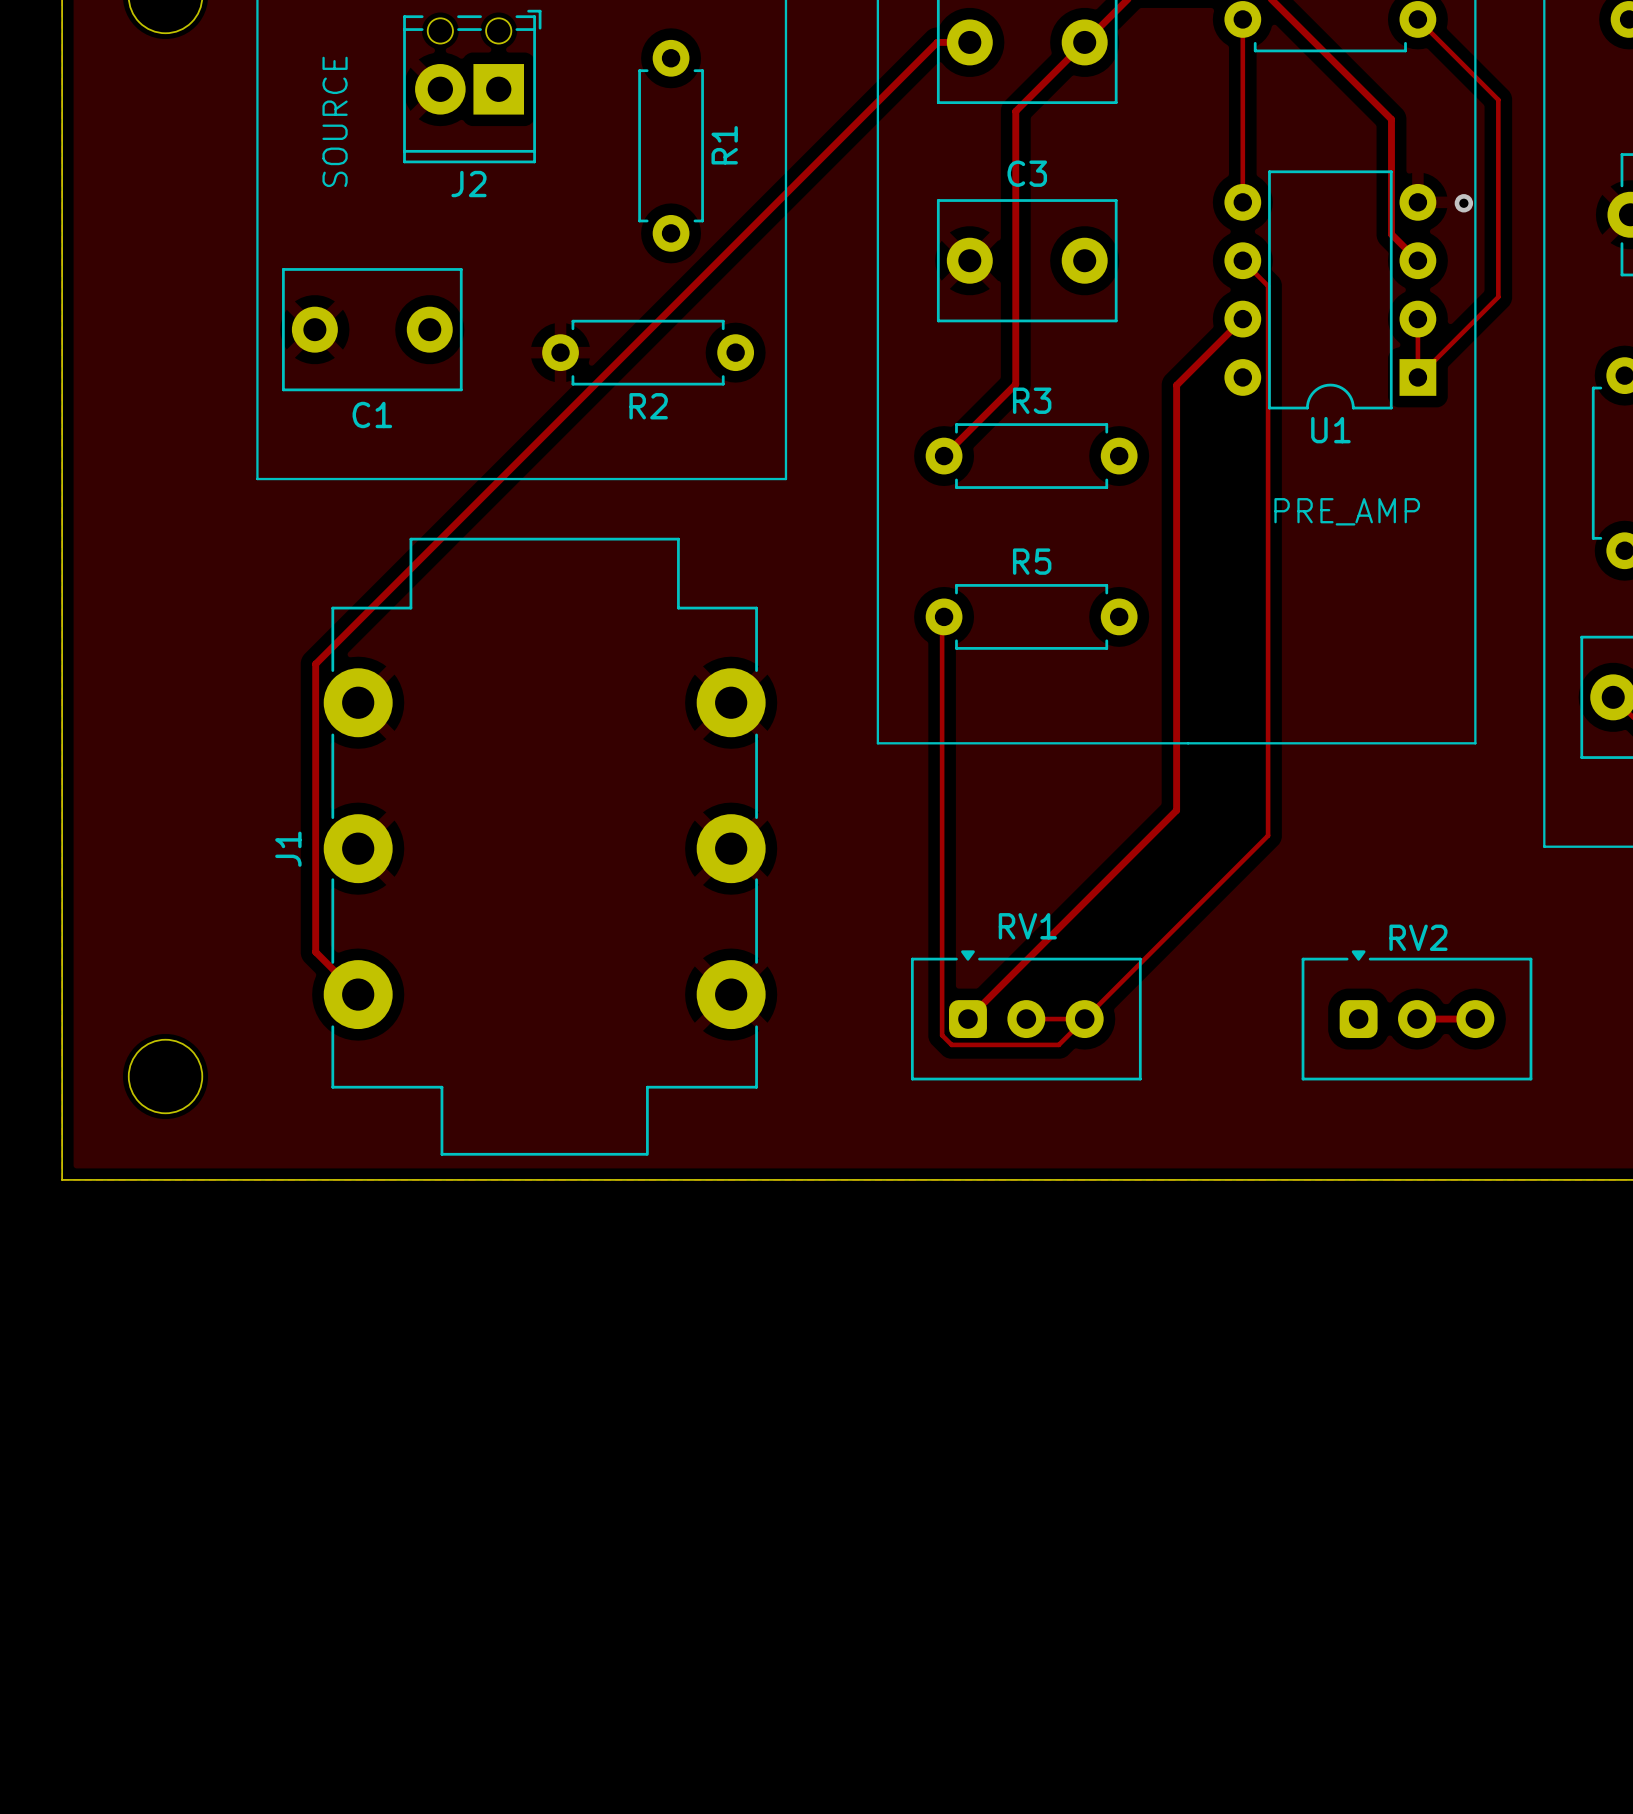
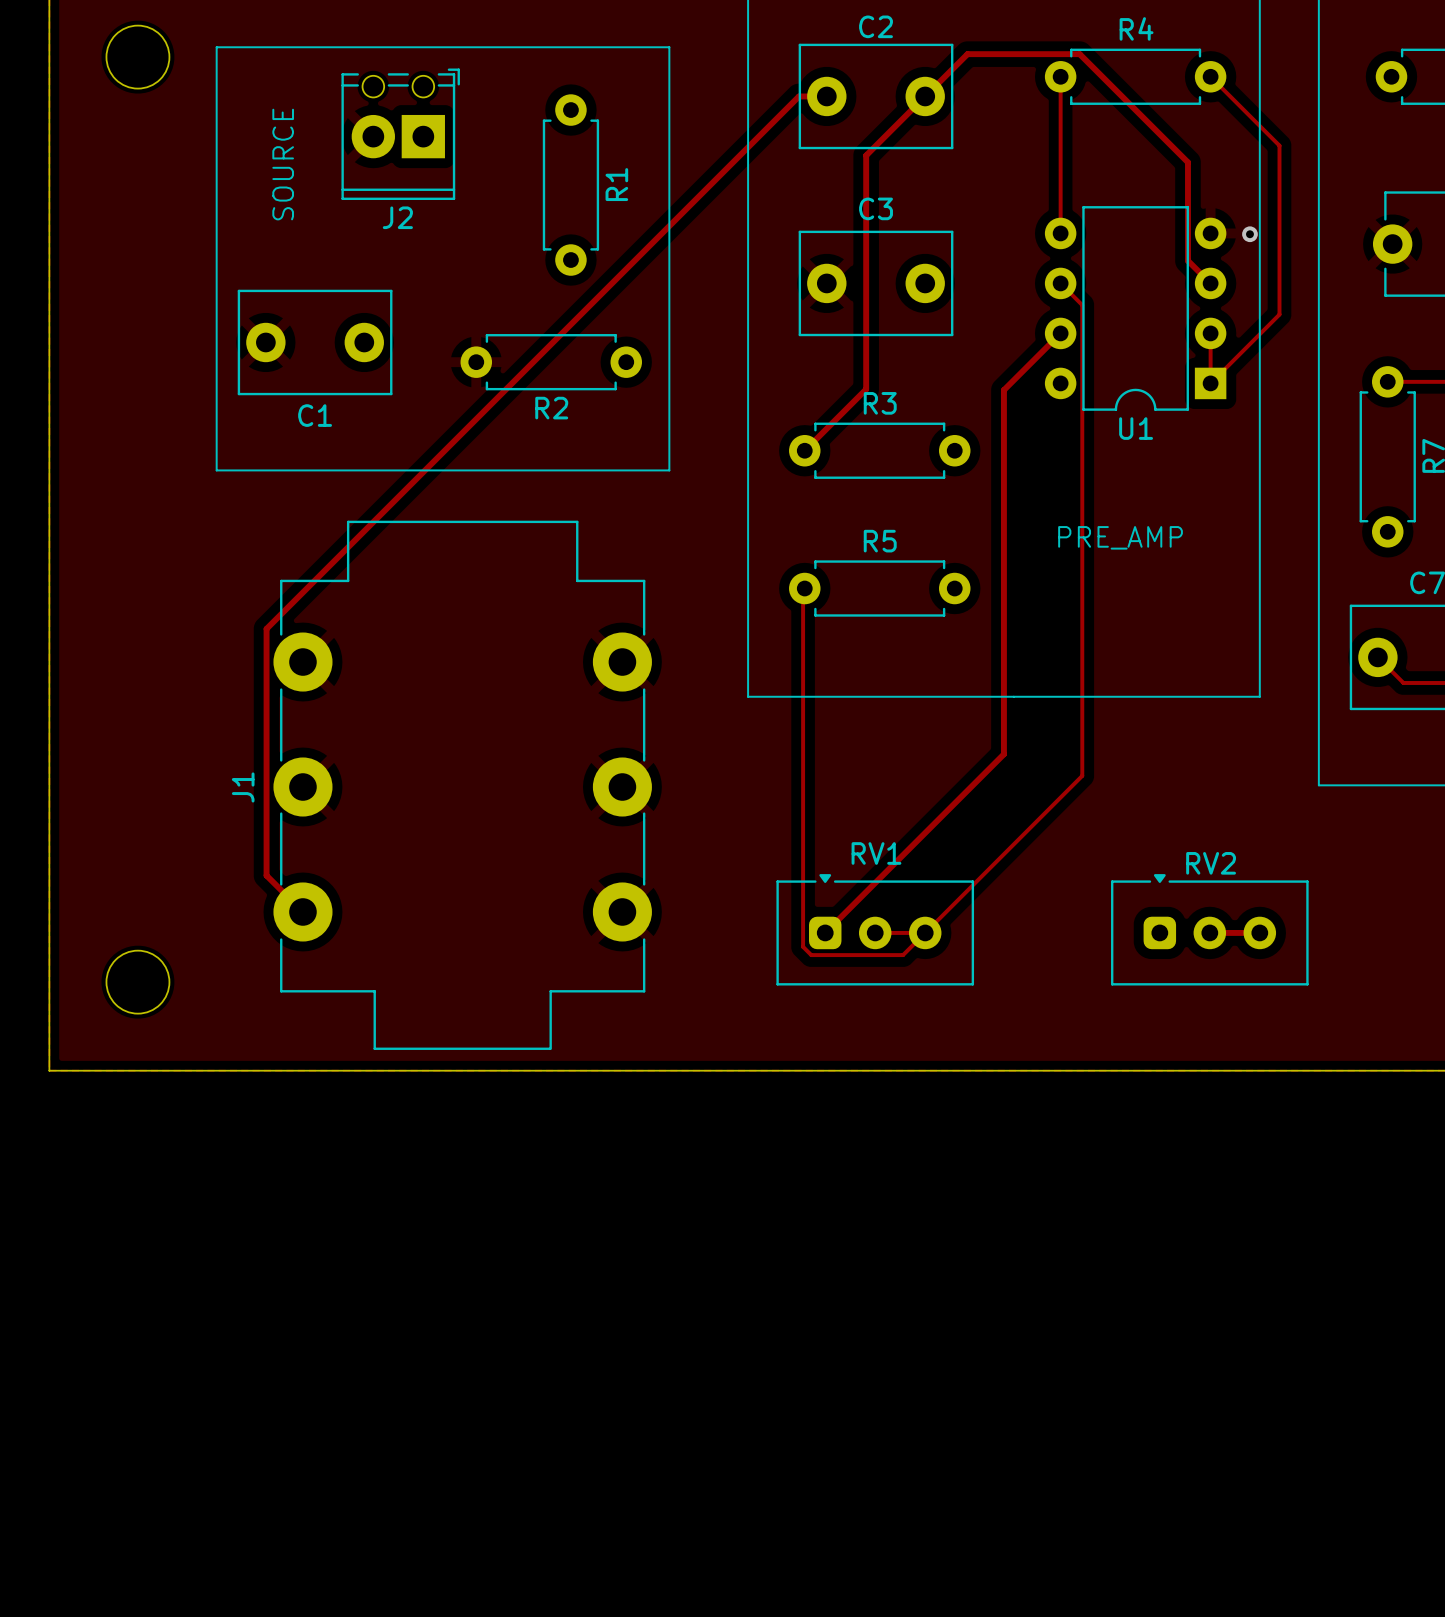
text position: PRE_AMP (1347, 511) -> PRE_AMP (1120, 537)

